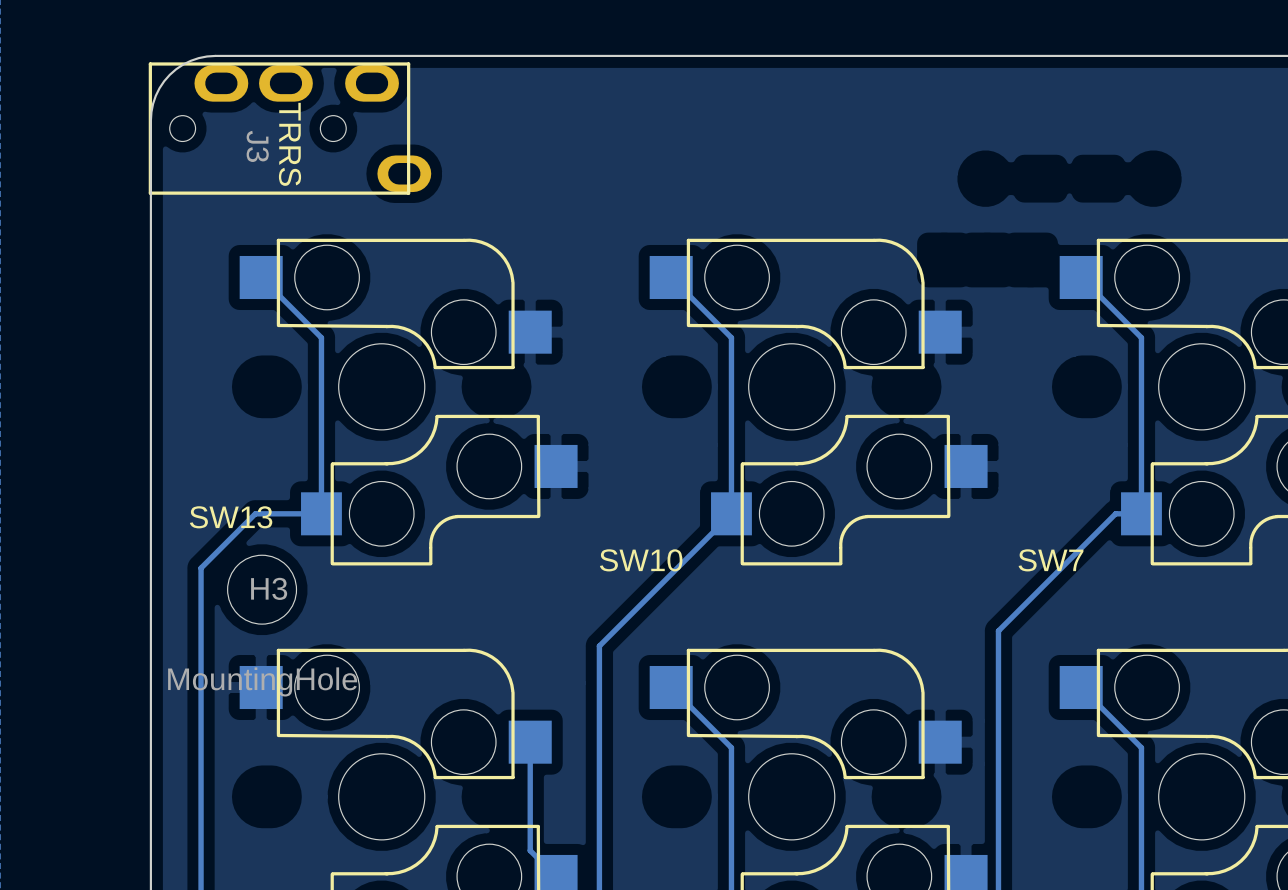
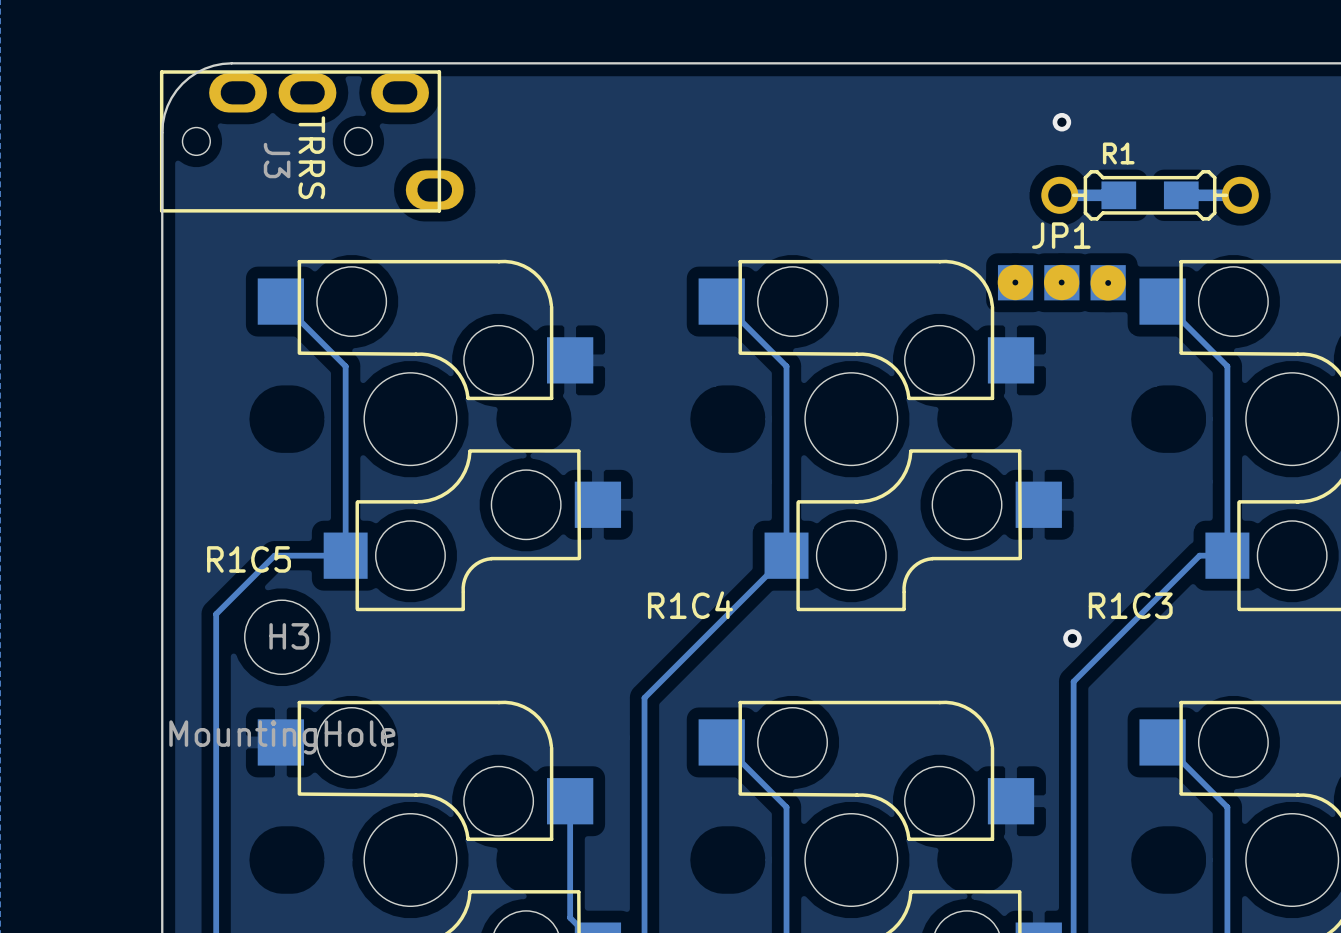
via: none -> (1061, 122)
R1: none -> (1150, 195)
JP1: none -> (1061, 282)
SW13 name: SW13 (231, 517) -> R1C5 (249, 559)
SW10 name: SW10 (641, 560) -> R1C4 (690, 605)
SW7 name: SW7 (1051, 560) -> R1C3 (1130, 605)
via: none -> (1072, 638)

